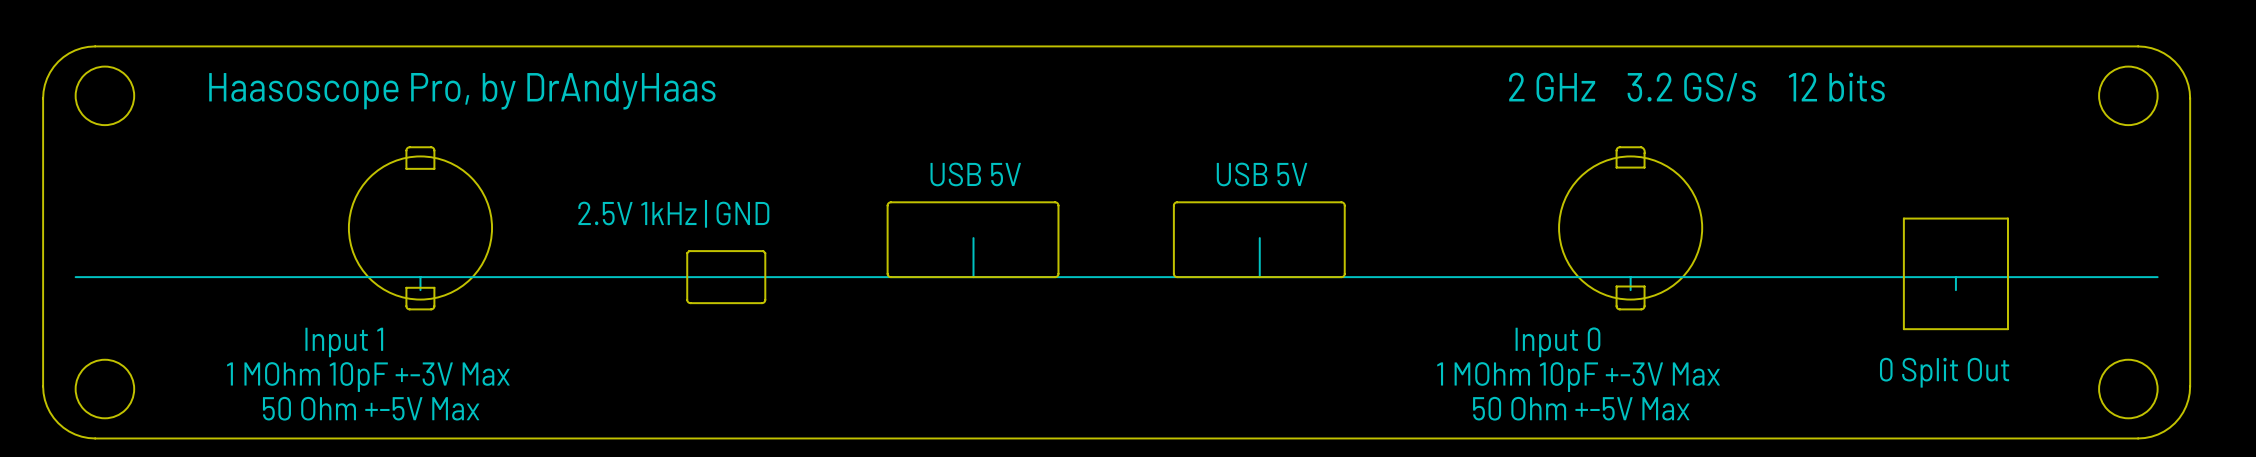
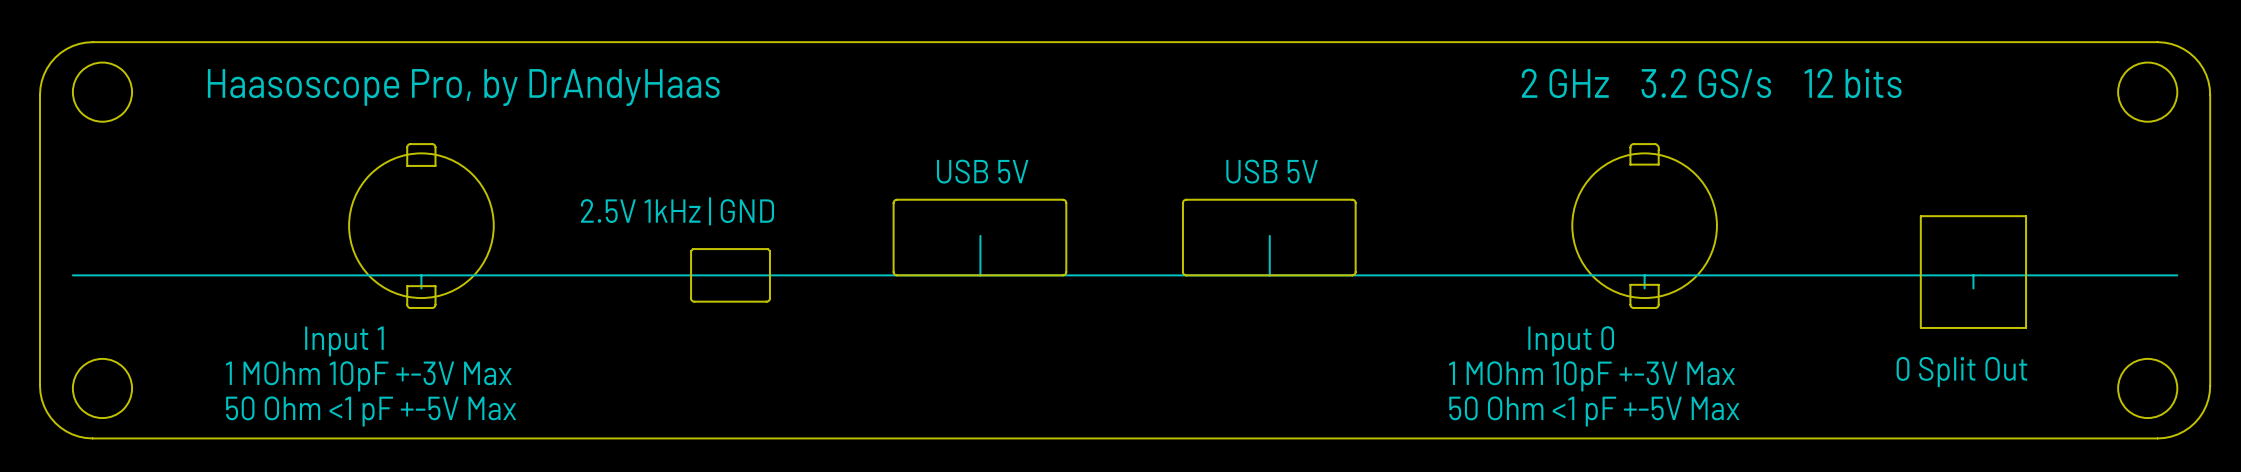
text: 50 Ohm +-5V Max (371, 408) -> 50 Ohm <1 pF +-5V Max (371, 411)
text: 50 Ohm +-5V Max (1581, 408) -> 50 Ohm <1 pF +-5V Max (1594, 411)

